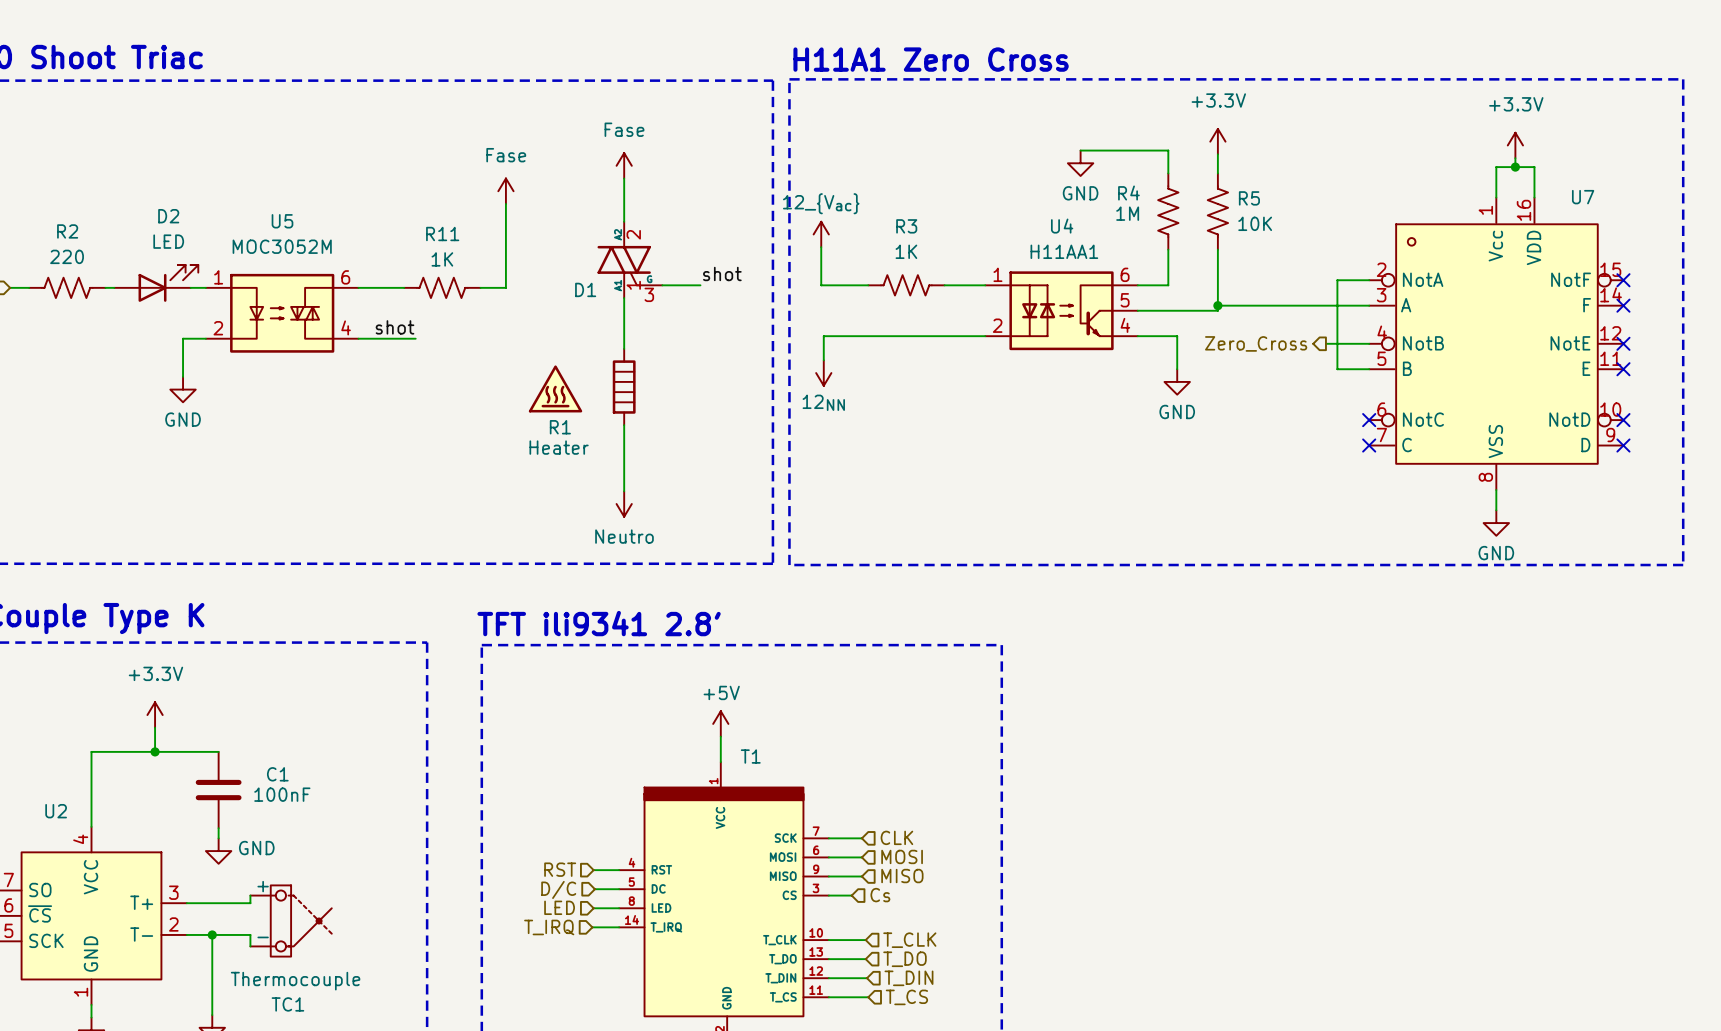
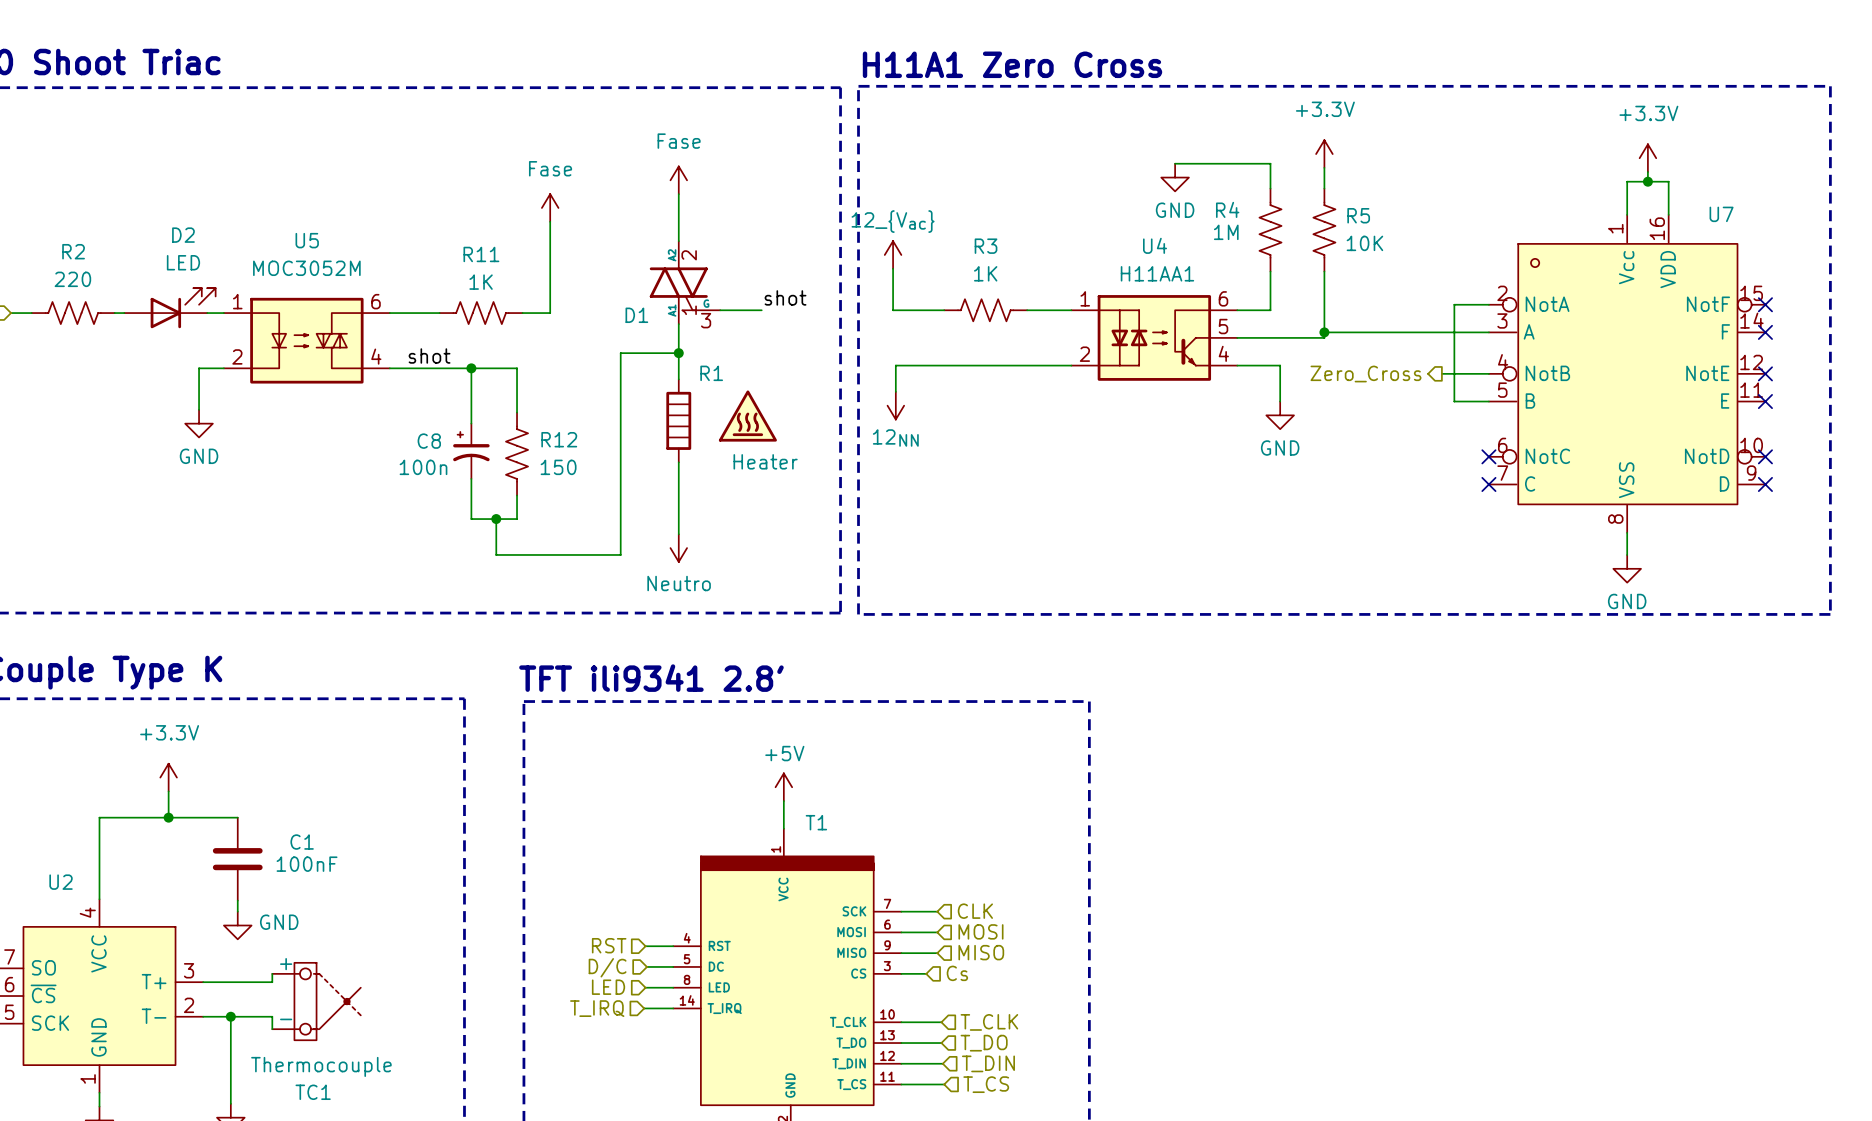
wire: none -> (678, 353) (620, 353) (620, 554) (496, 554) (496, 519)
junction: none -> (678, 353)
wire: none -> (452, 368) (517, 368) (517, 412)
wire: none -> (471, 368) (471, 423)
junction: none -> (471, 368)
power symbol position: (555, 388) -> (747, 416)
C8: none -> 100n (471, 451)
R12: none -> 150 (517, 454)
R1 name position: R1 (560, 427) -> R1 (711, 373)
wire: none -> (471, 478) (471, 519) (517, 519) (517, 495)
R1 value position: Heater (559, 447) -> Heater (765, 461)
junction: none -> (496, 519)

